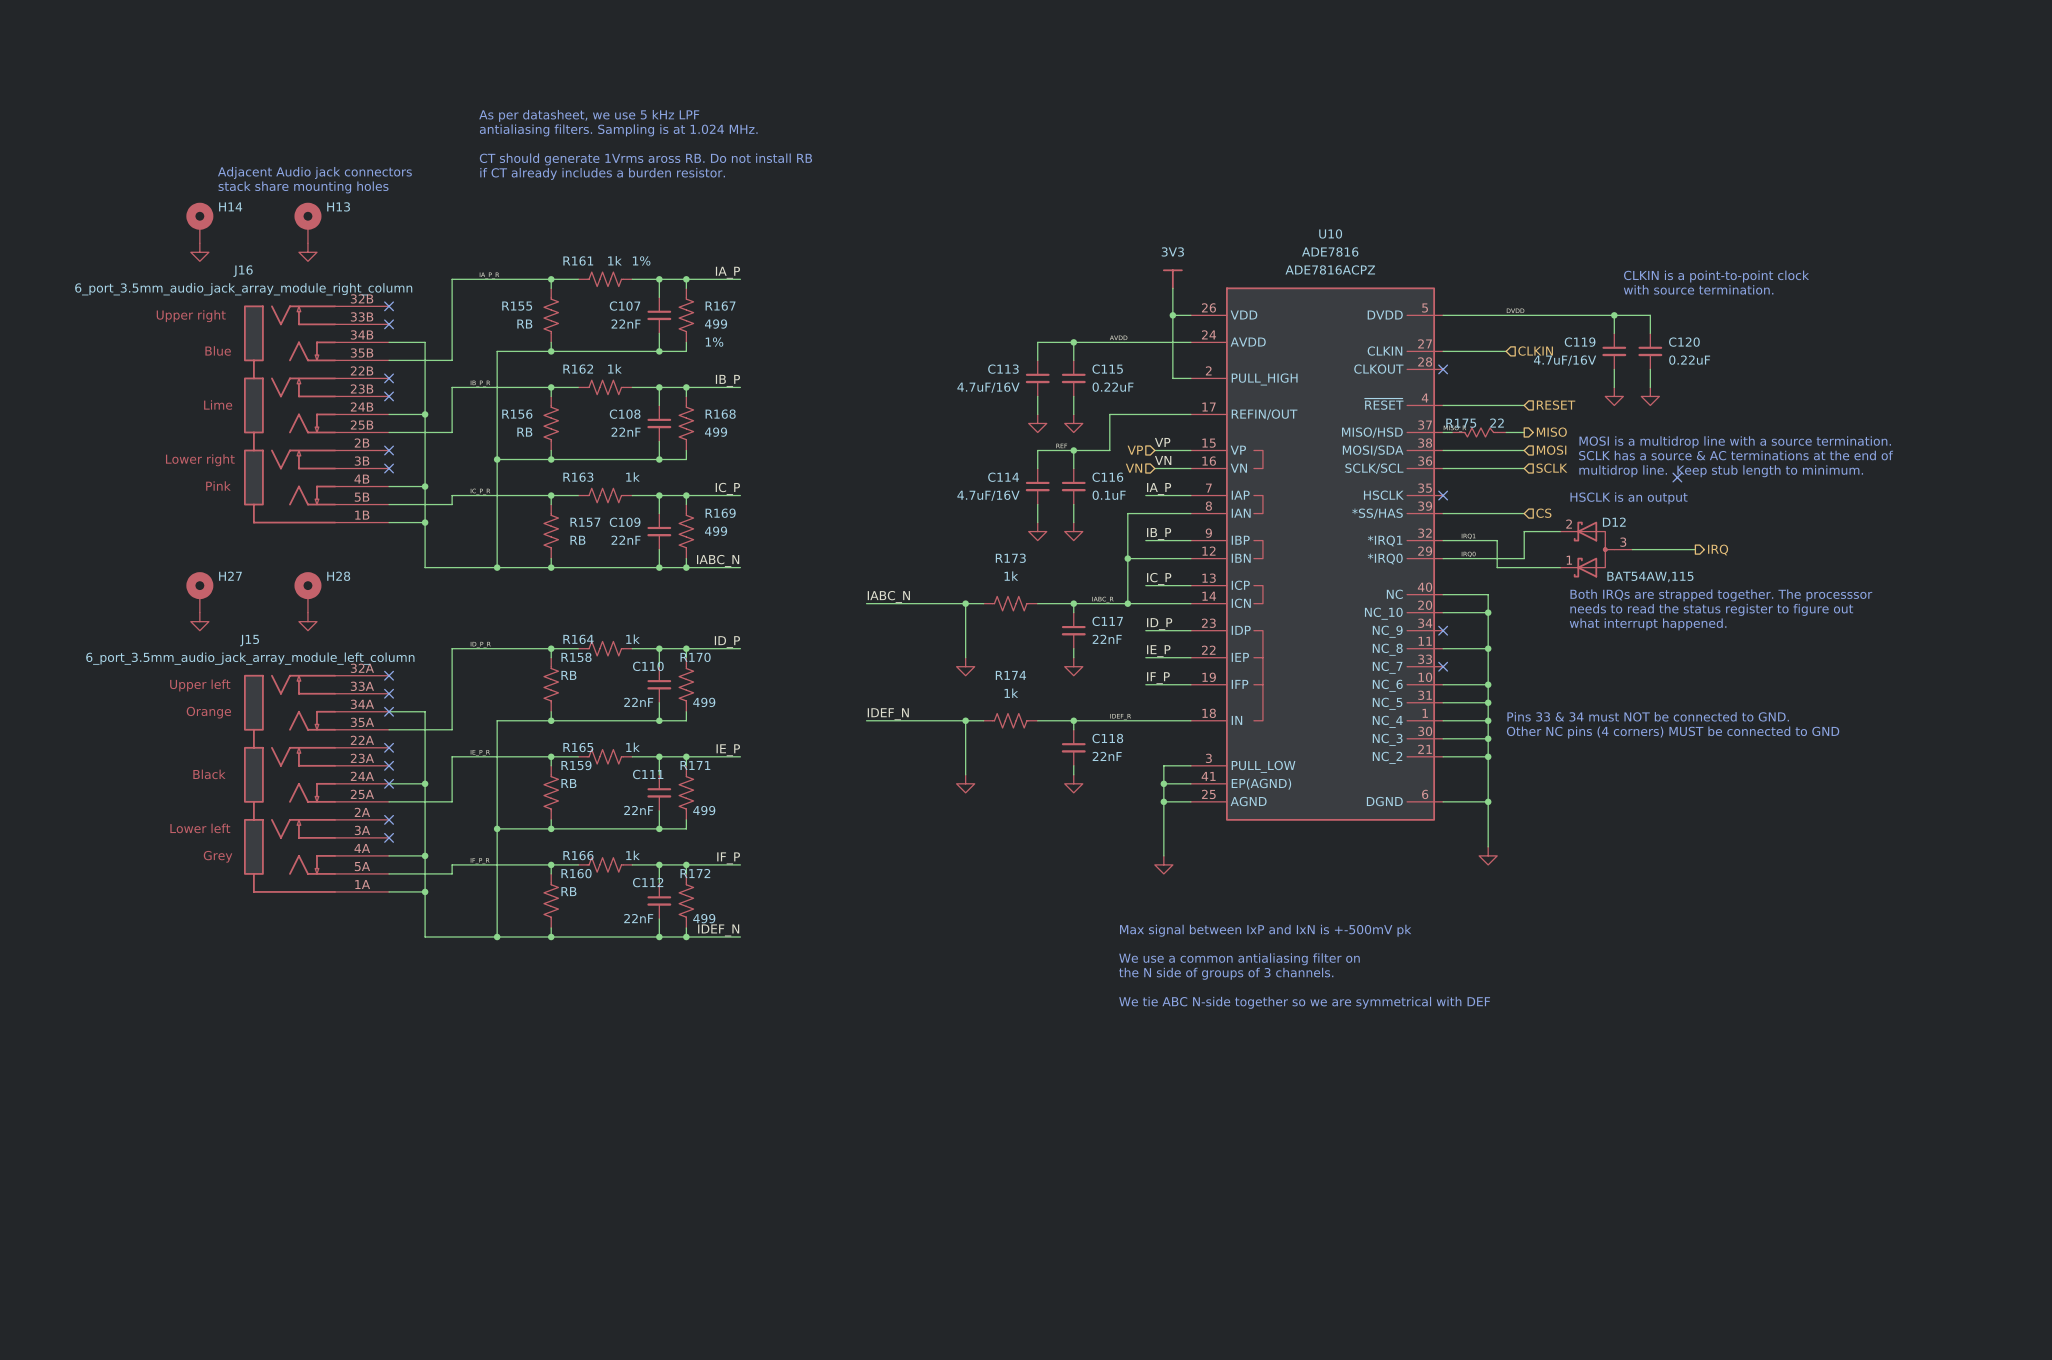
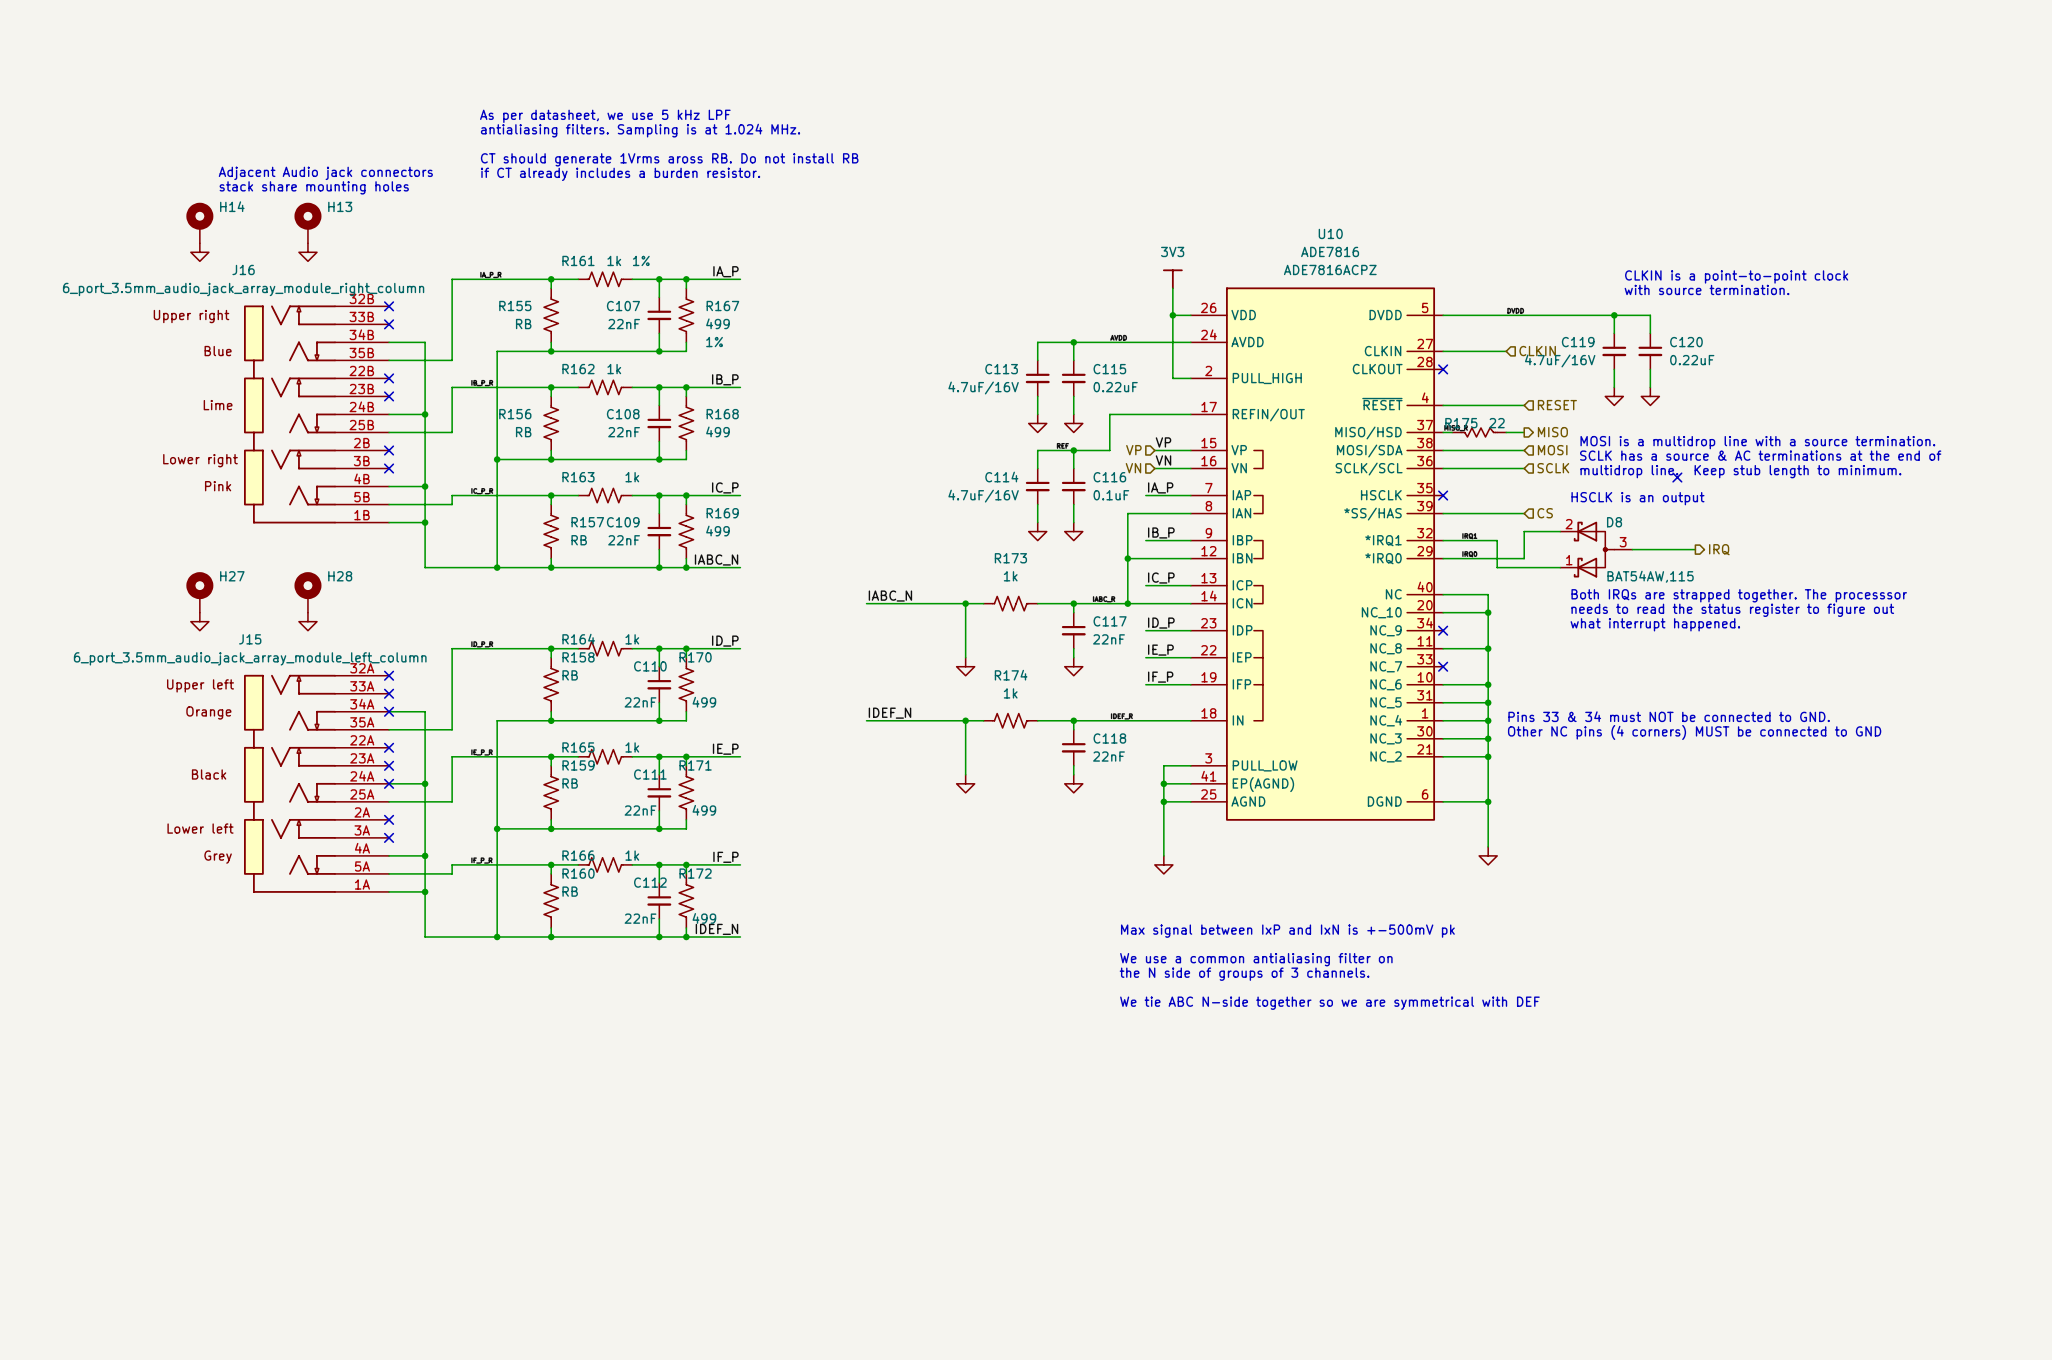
D12 name: D12 (1614, 522) -> D8 (1614, 522)

